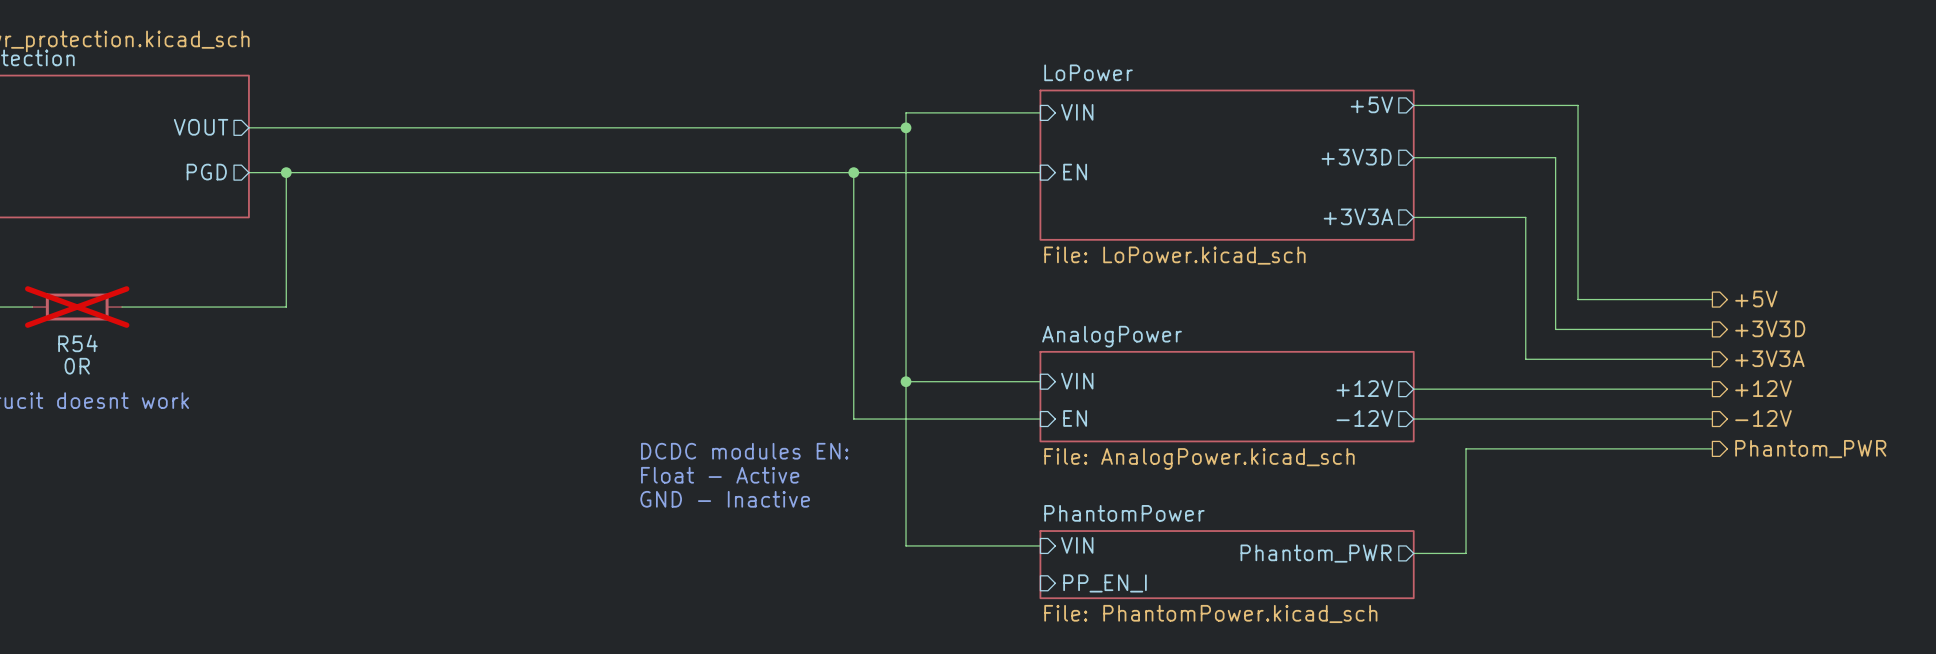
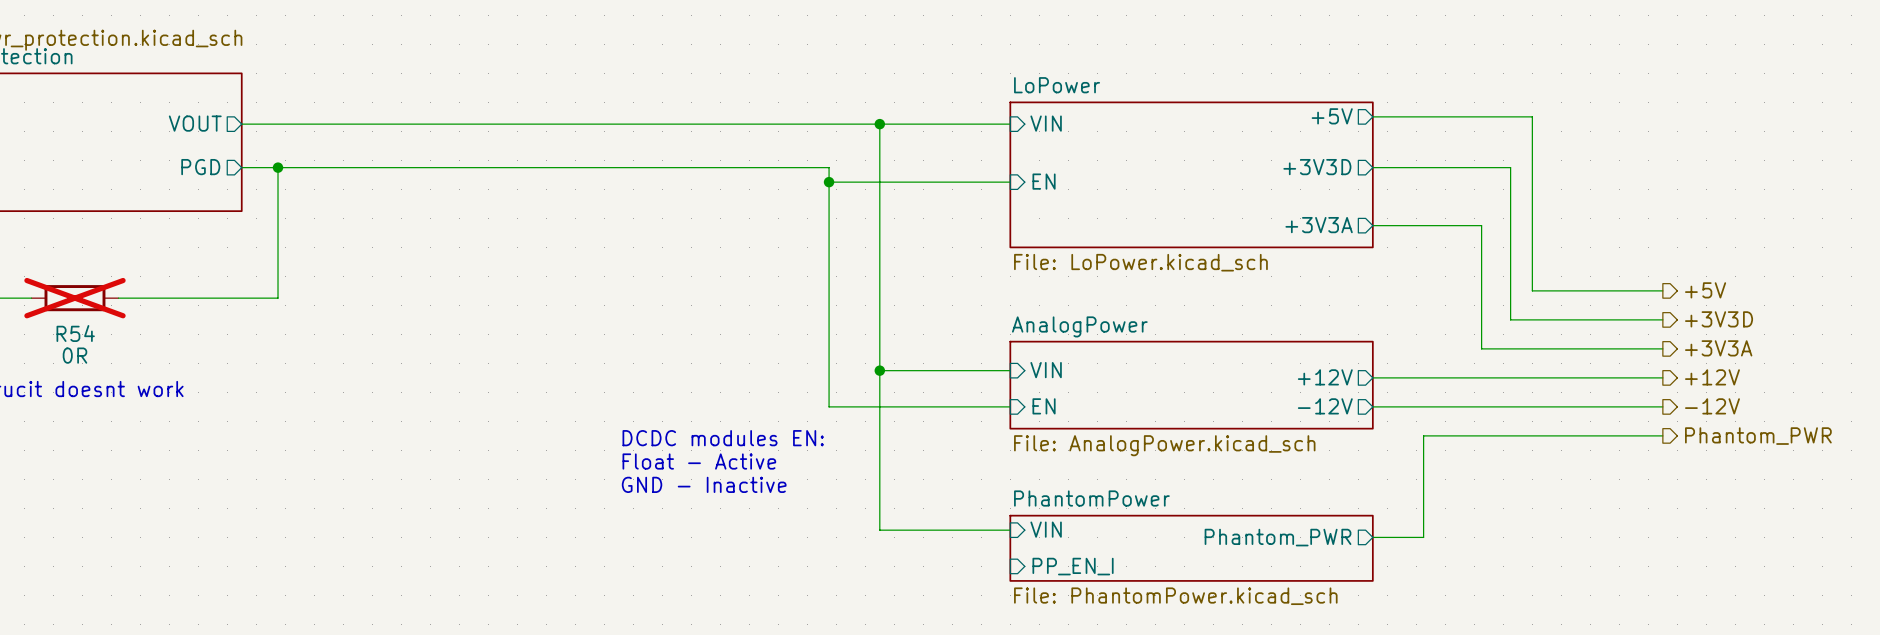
sheet pin position: +5V (1371, 104) -> +5V (1332, 116)
wire: (1413, 105) (1578, 105) (1578, 120) -> (1372, 116) (1532, 116)
wire: (1040, 112) (906, 112) (906, 127) -> (1010, 124) (879, 124)
sheet pin position: VIN (1077, 112) -> VIN (1046, 123)
sheet pin position: +3V3D (1356, 157) -> +3V3D (1317, 167)
wire: (1413, 157) (1555, 157) (1555, 172) -> (1372, 167) (1510, 167)
sheet LoPower position: (1227, 165) -> (1191, 174)
wire: (853, 172) (1040, 172) -> (829, 182) (1010, 182)
junction position: (853, 172) -> (829, 182)
sheet pin position: EN (1075, 172) -> EN (1044, 181)
sheet pin position: +3V3A (1358, 216) -> +3V3A (1319, 225)
wire: (1413, 217) (1525, 217) (1525, 232) -> (1372, 225) (1481, 225)

